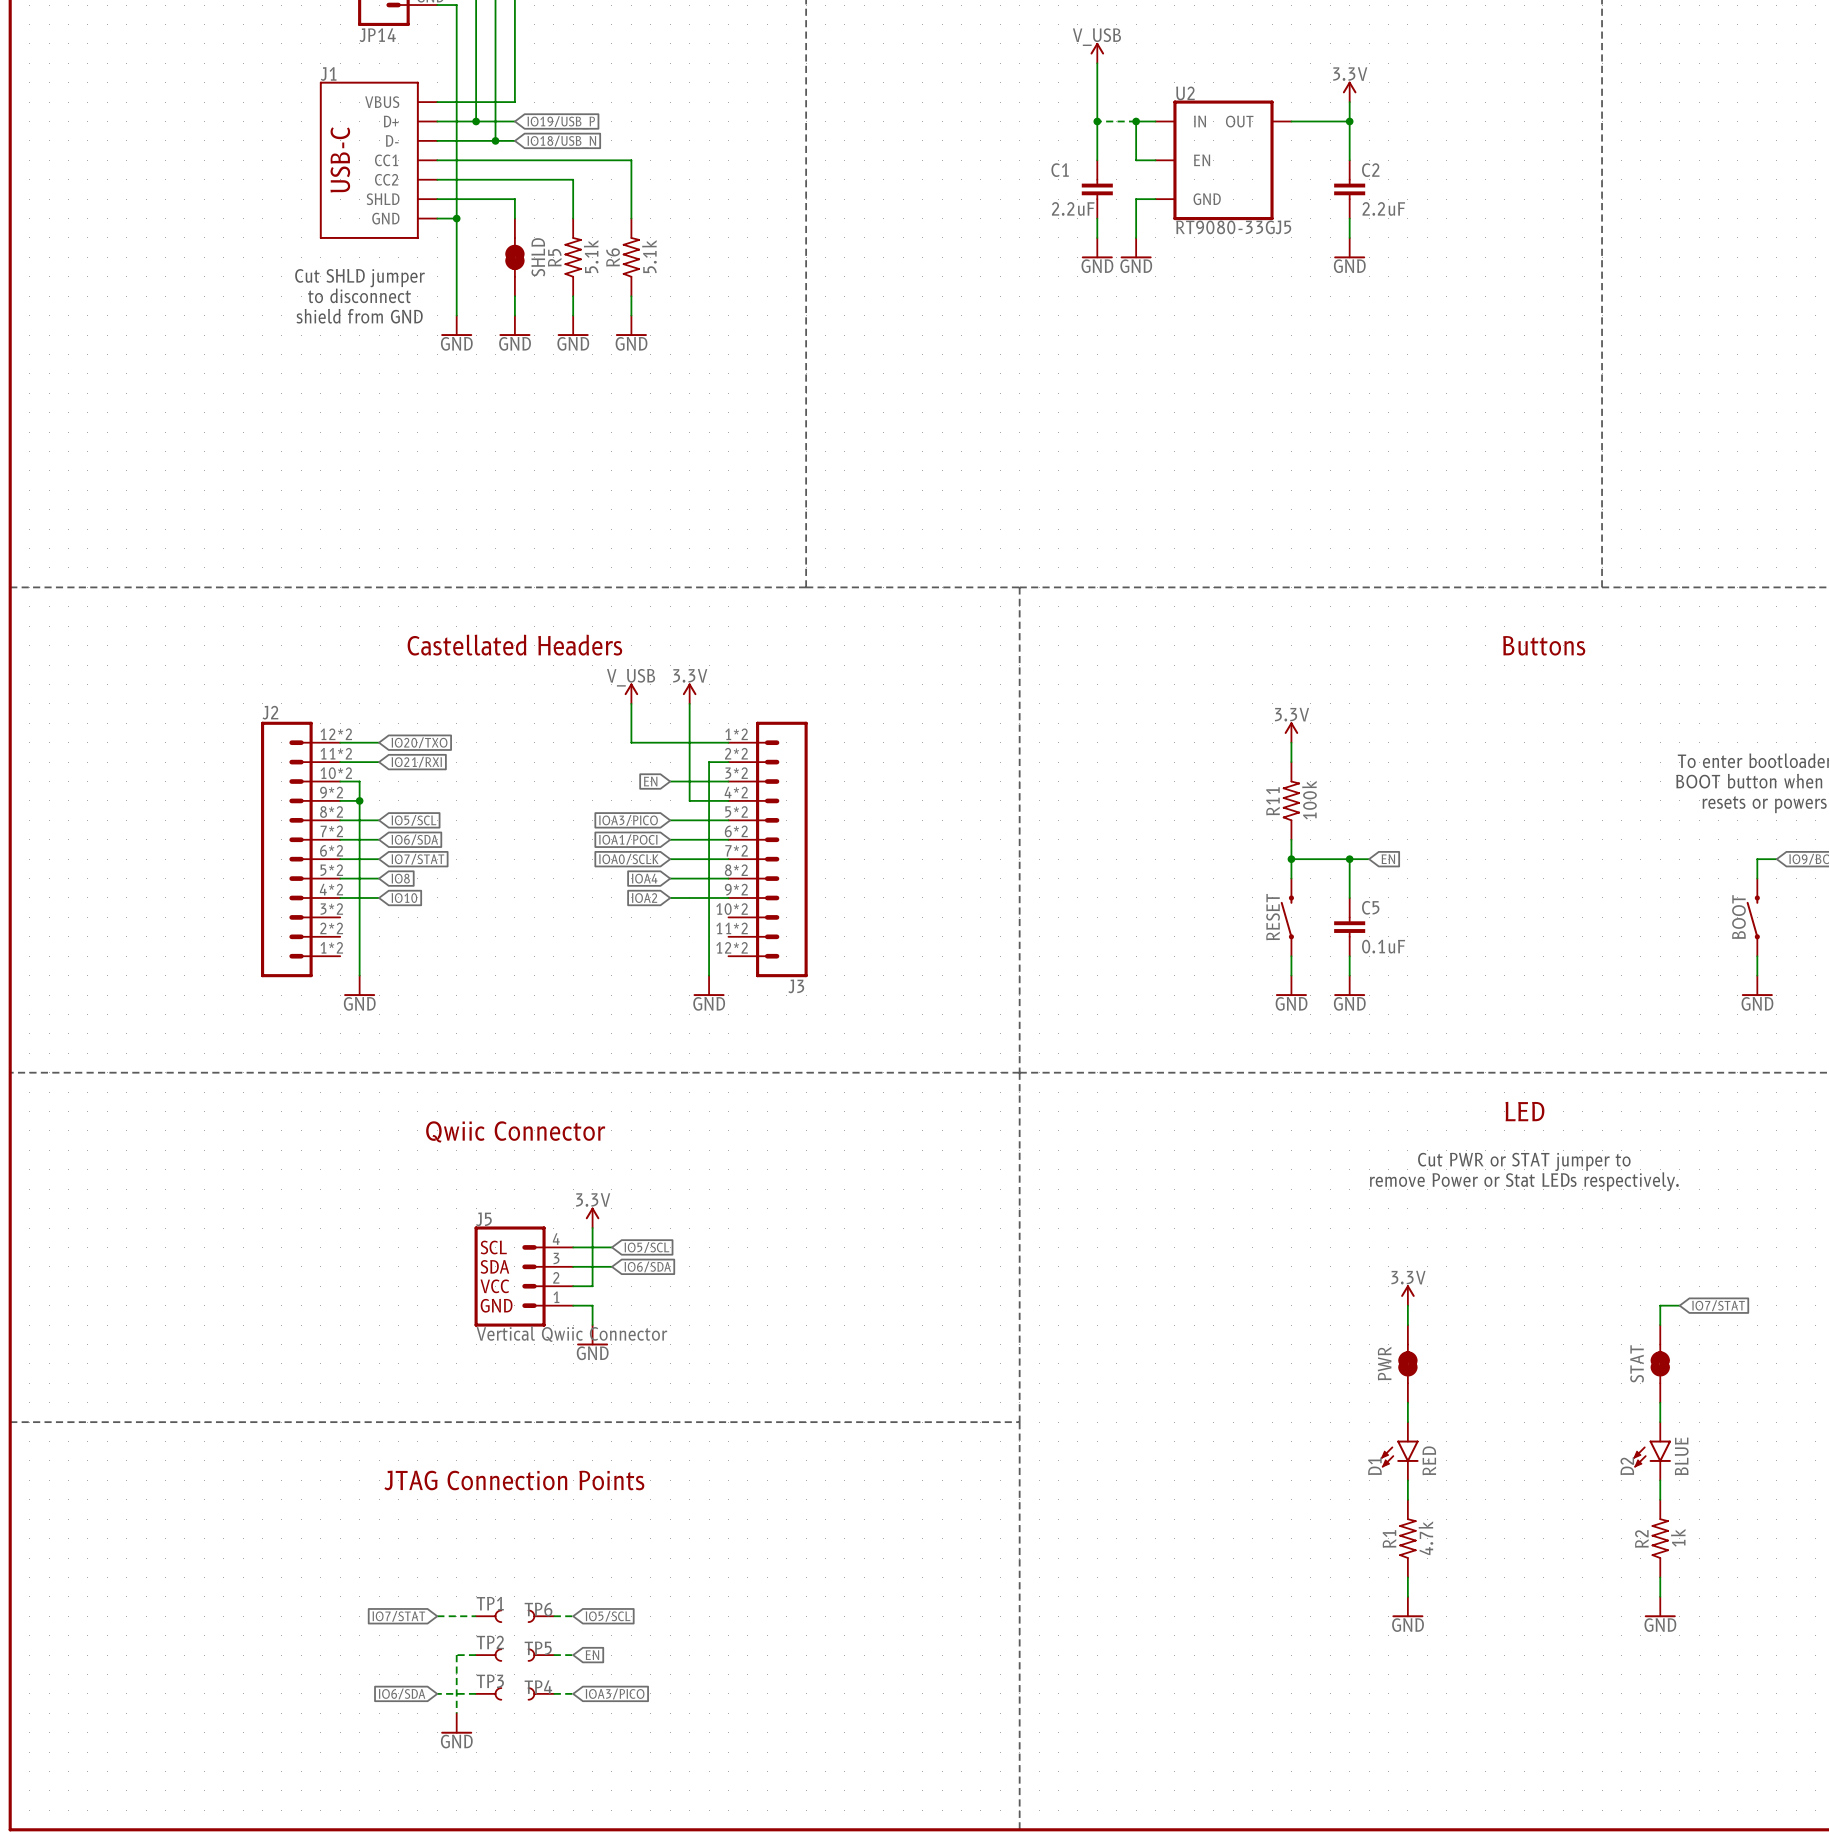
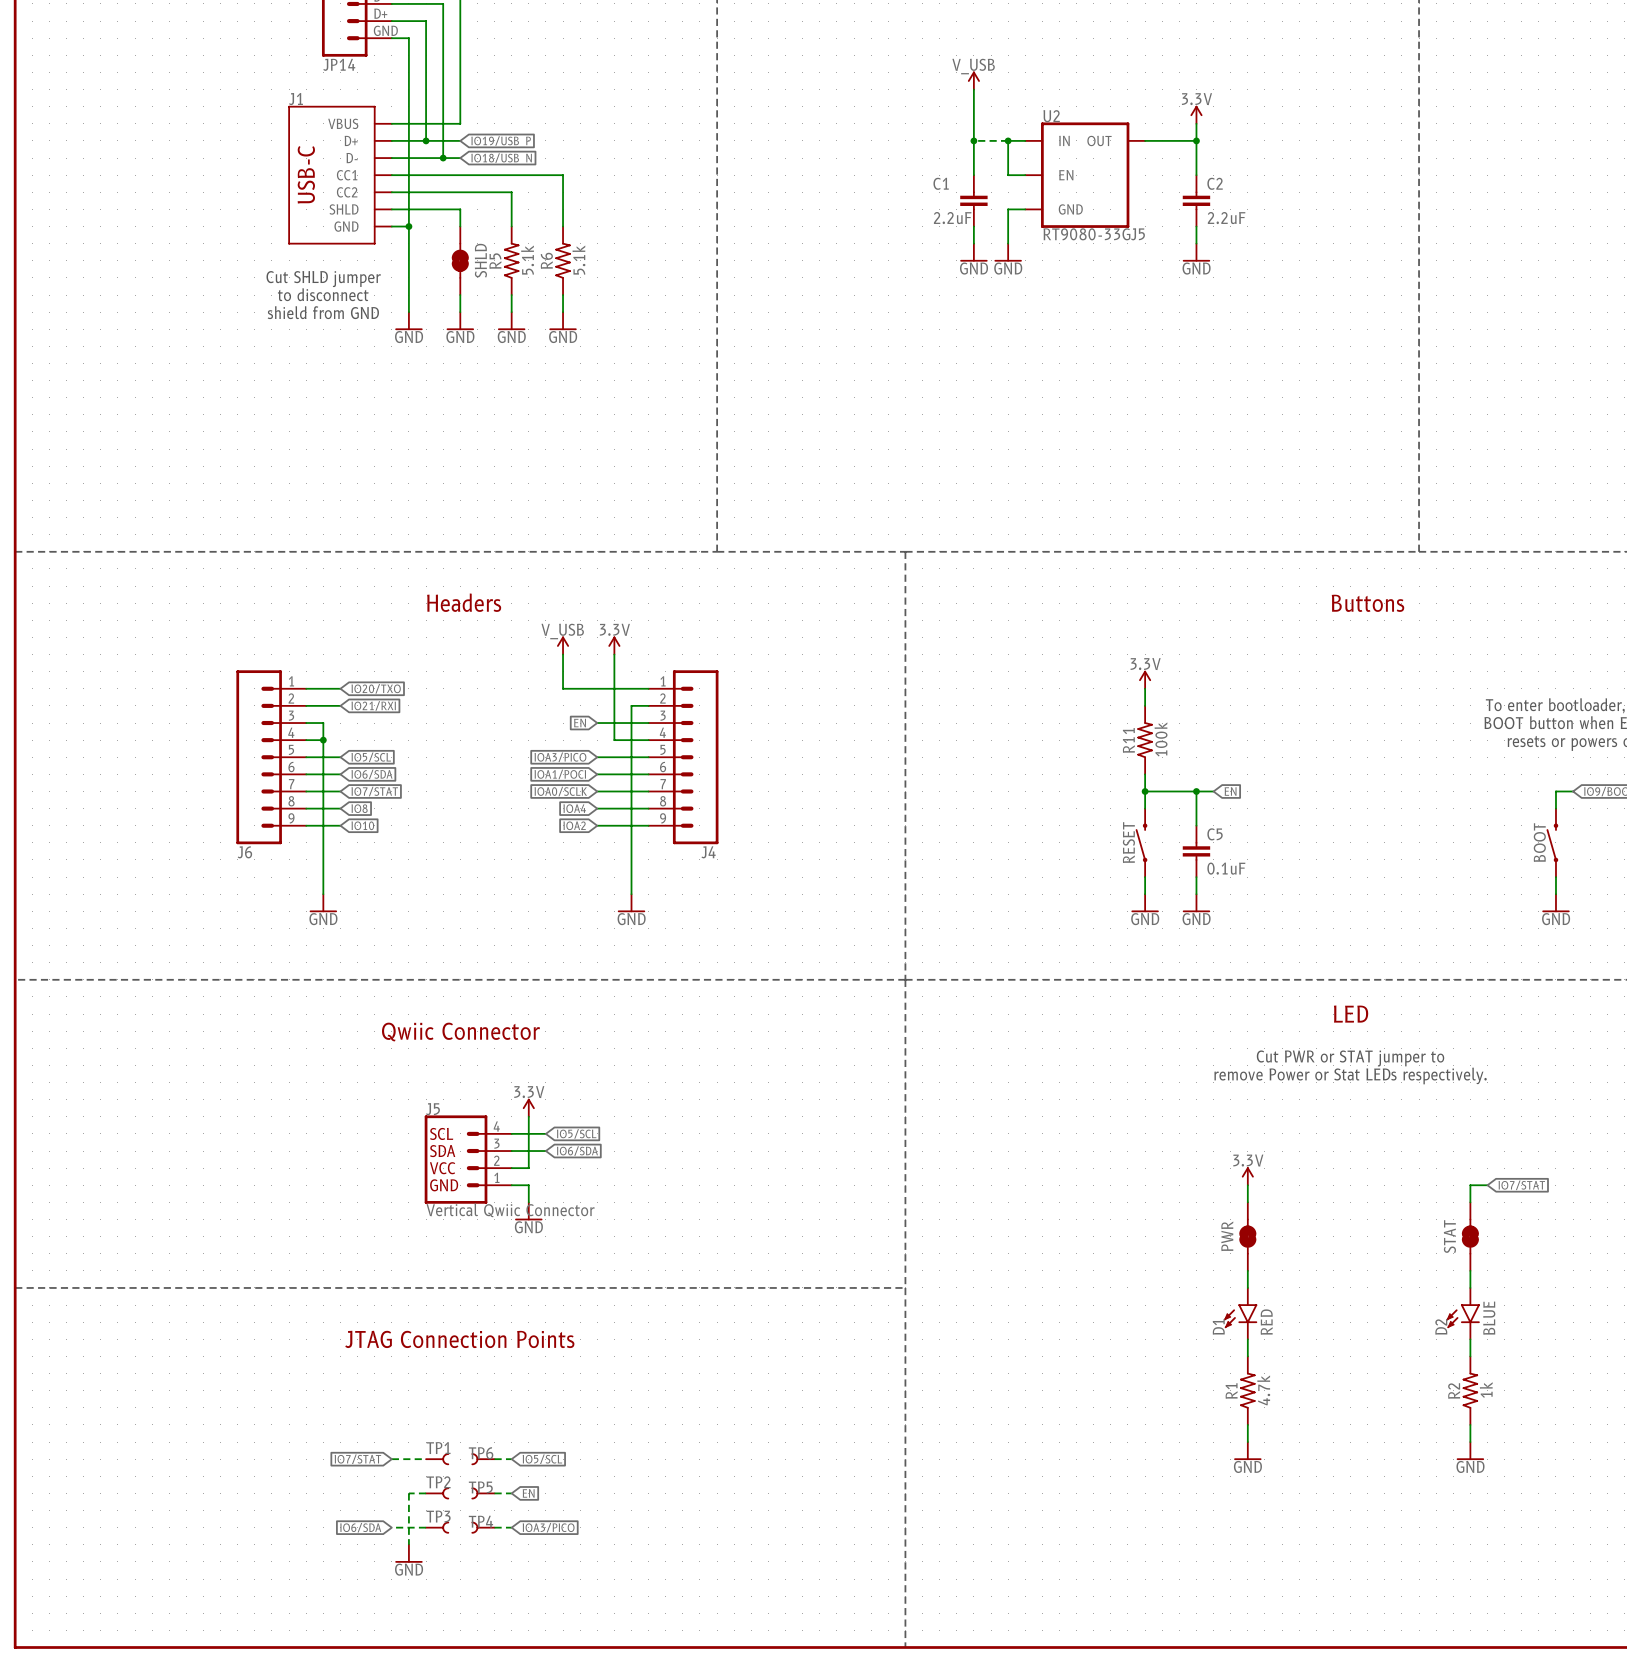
text: Castellated Headers (514, 645) -> Headers (464, 602)
J6: none -> (271, 757)
J4: none -> (683, 757)
J2: (300, 849) -> none
J3: (768, 849) -> none

